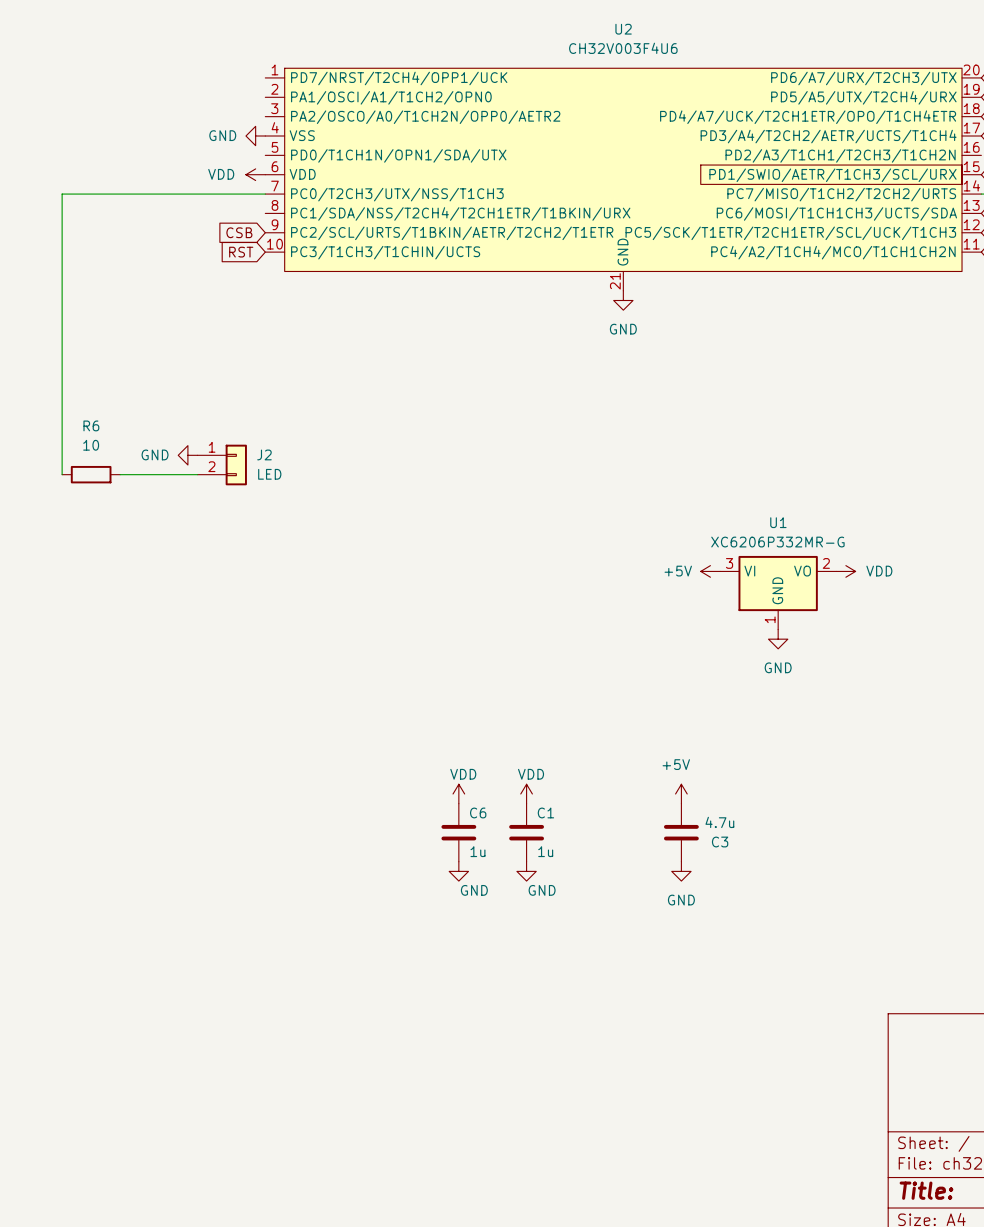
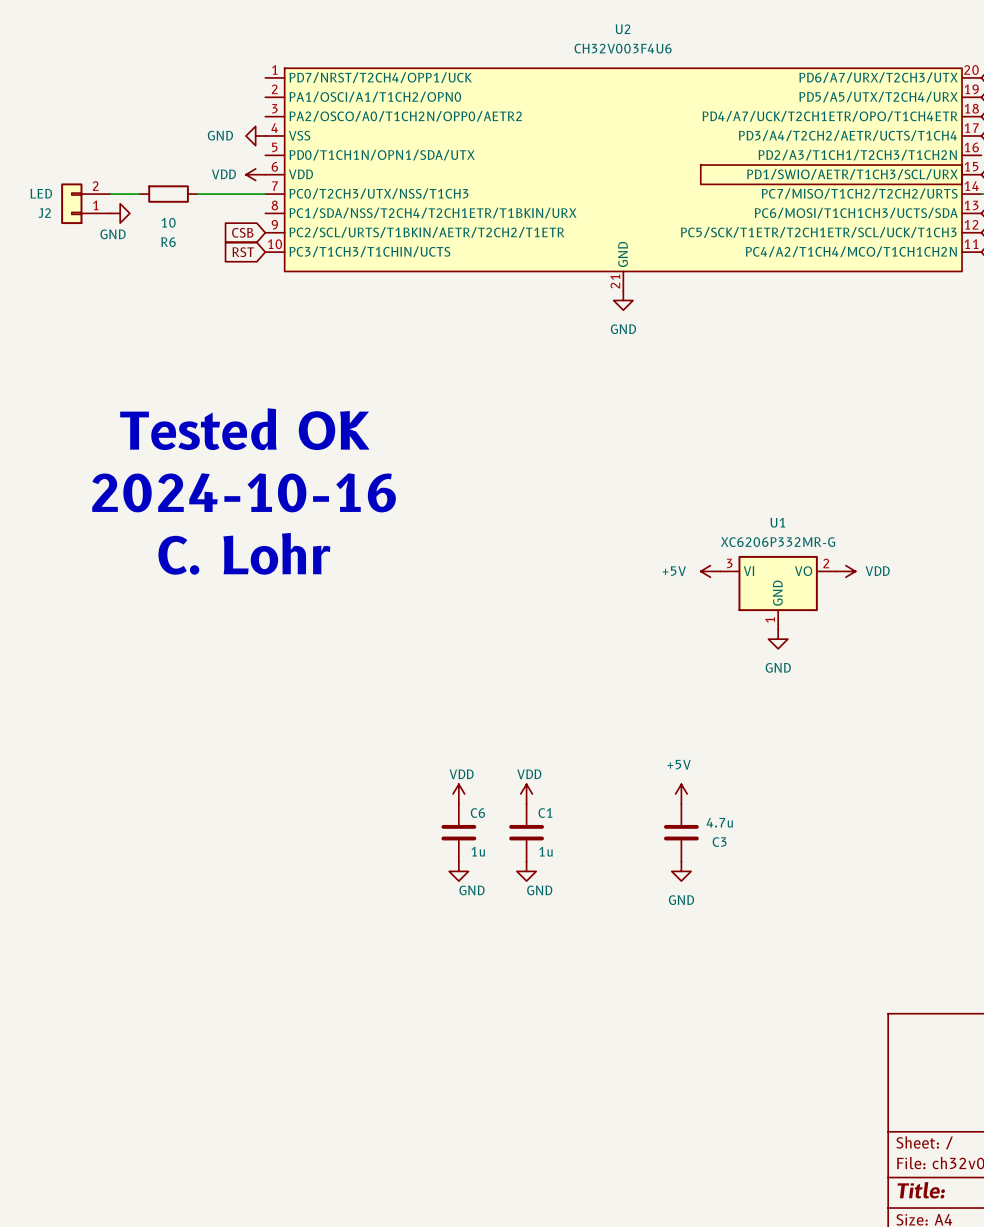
wire: (110, 194) (62, 194) (62, 474) -> none
wire: (139, 194) (197, 194) -> none
power symbol: none -> GND (120, 213)
R6 name position: R6 (91, 425) -> R6 (168, 242)
text: none -> Tested OK (244, 429)
R6 value position: 10 (91, 445) -> 10 (168, 222)
power symbol: GND (187, 455) -> none
J2 position: (222, 464) -> (85, 203)
J2 rotation: 0° (236, 464) -> 180° (71, 203)
R6 position: (91, 474) -> (168, 194)
wire: (120, 474) (197, 474) -> none
text: none -> 2024-10-16 (244, 492)
text: none -> C. Lohr (244, 553)

